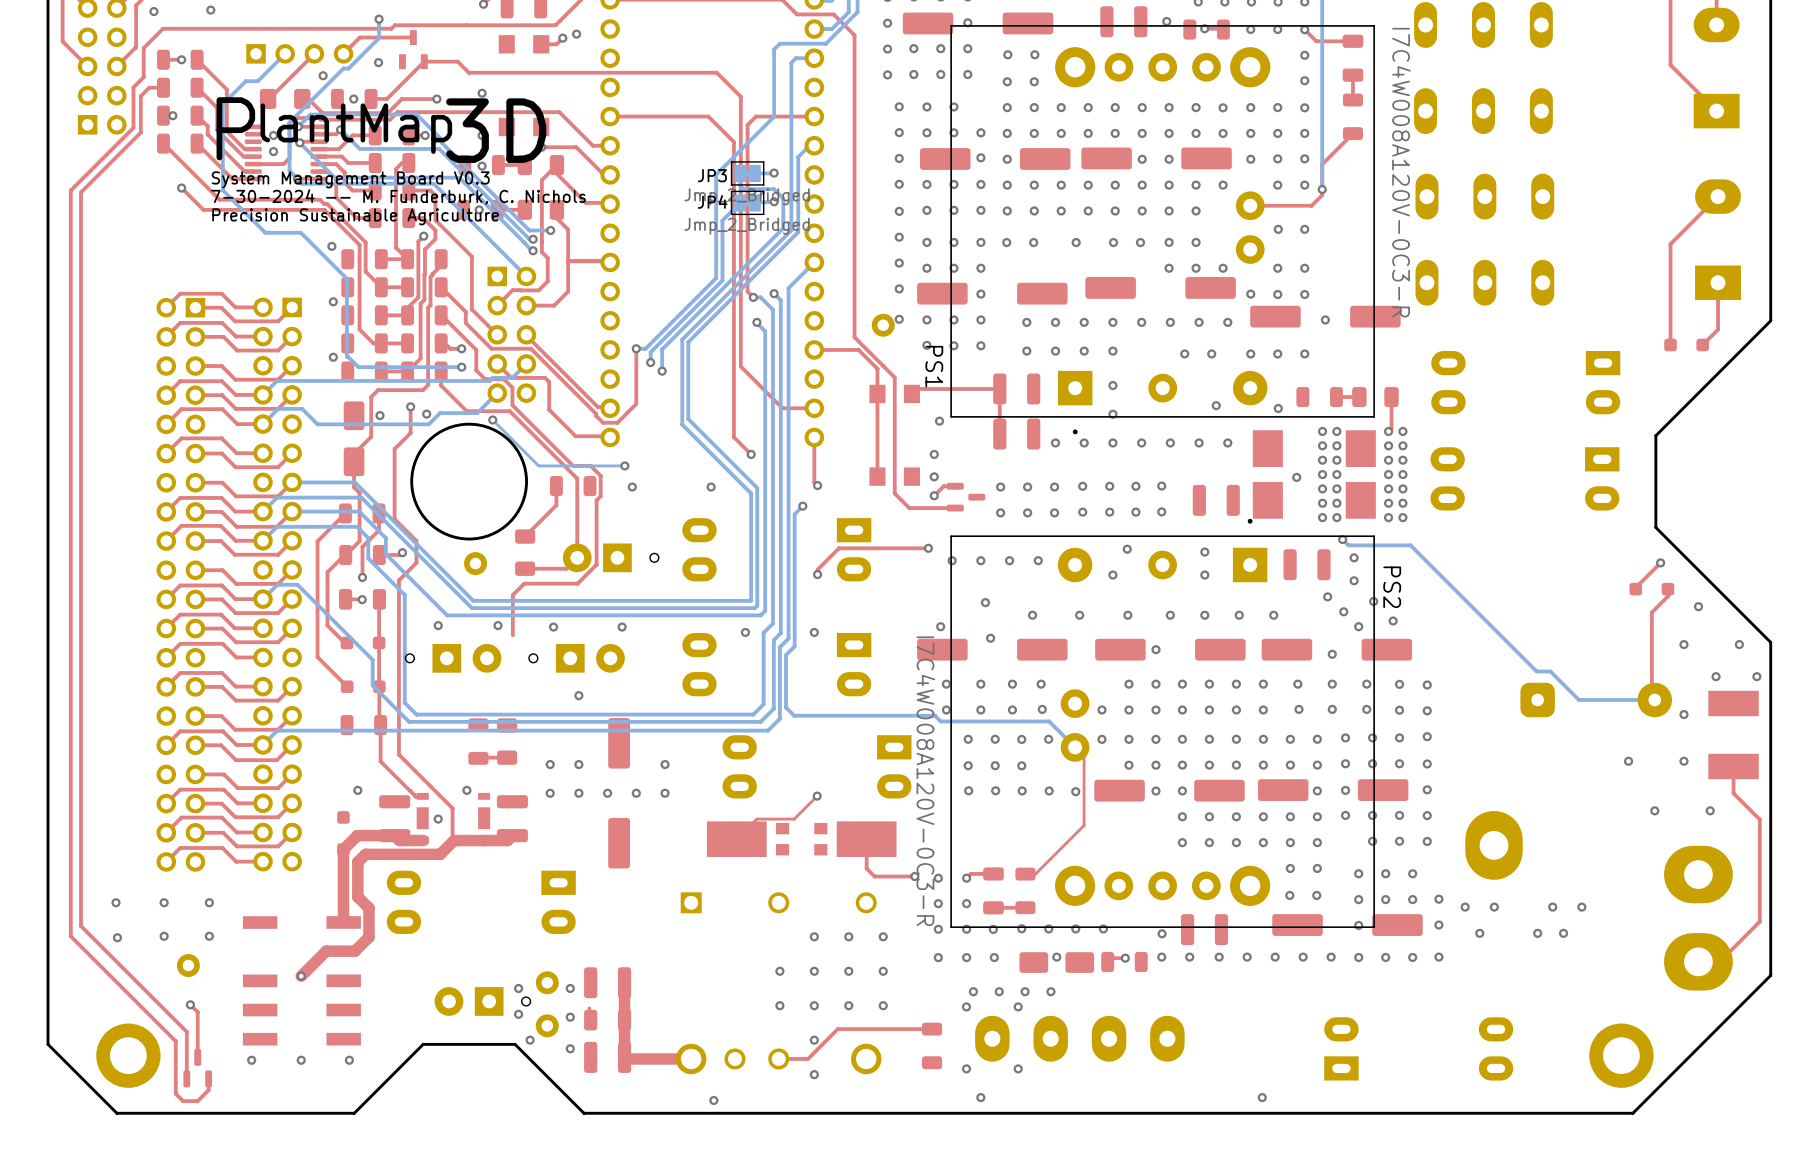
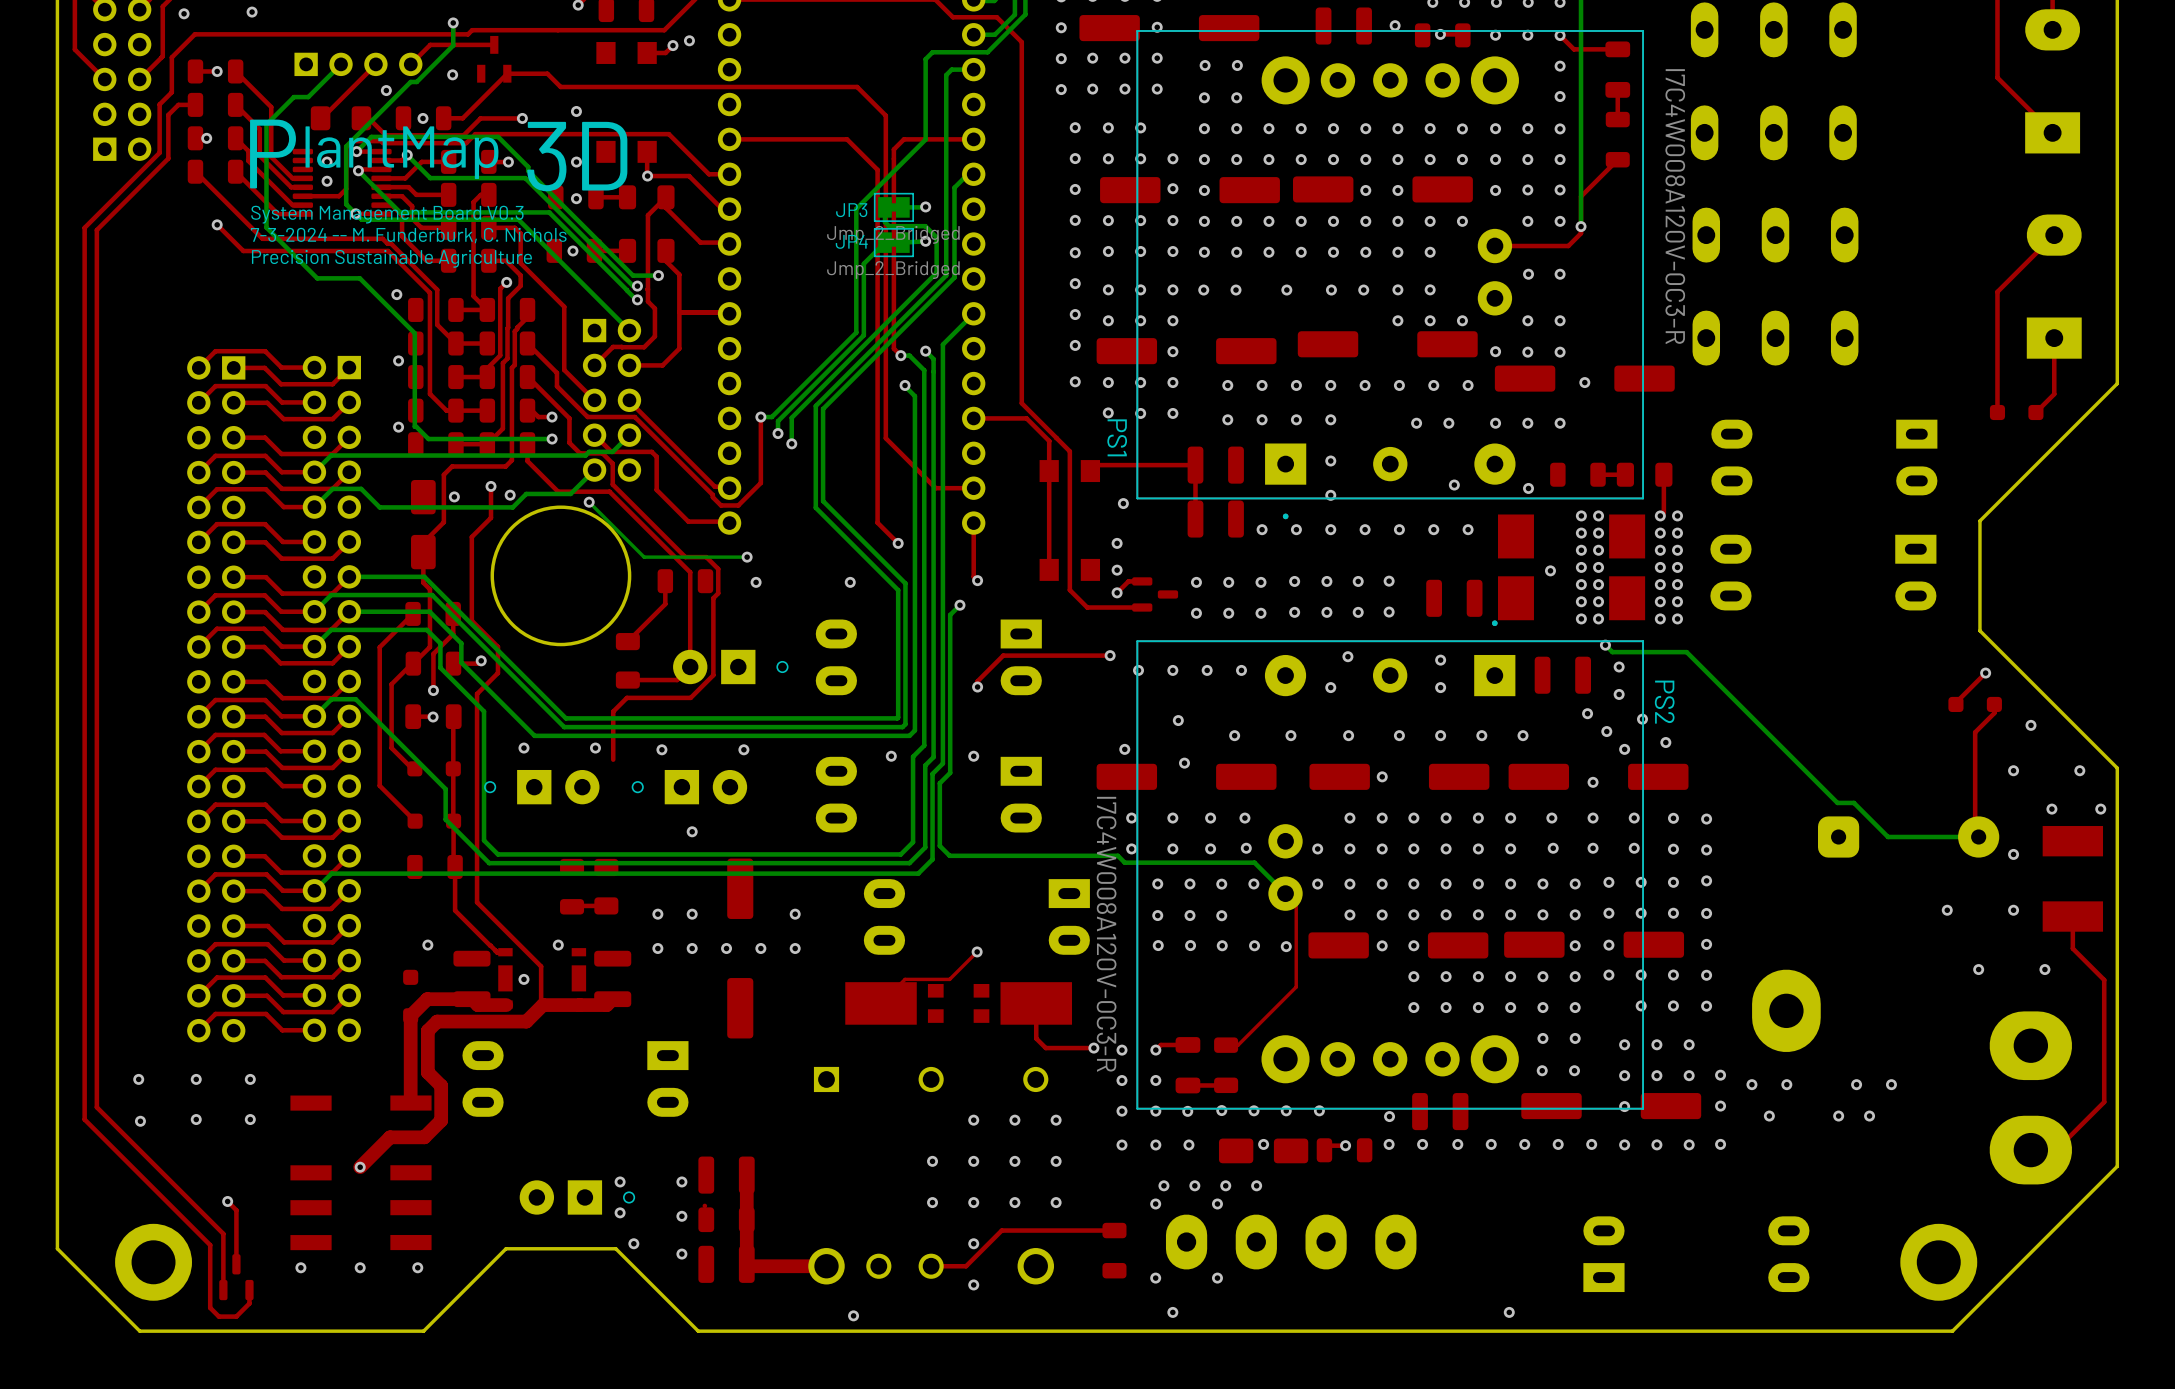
text: 7-30-2024 -- M. Funderburk, C. Nichols (398, 196) -> 7-3-2024 -- M. Funderburk, C. Nichols (408, 235)
part: (883, 325) -> none
part: (475, 563) -> none
part: (188, 965) -> none
part: (547, 982) -> none
part: (547, 1025) -> none

